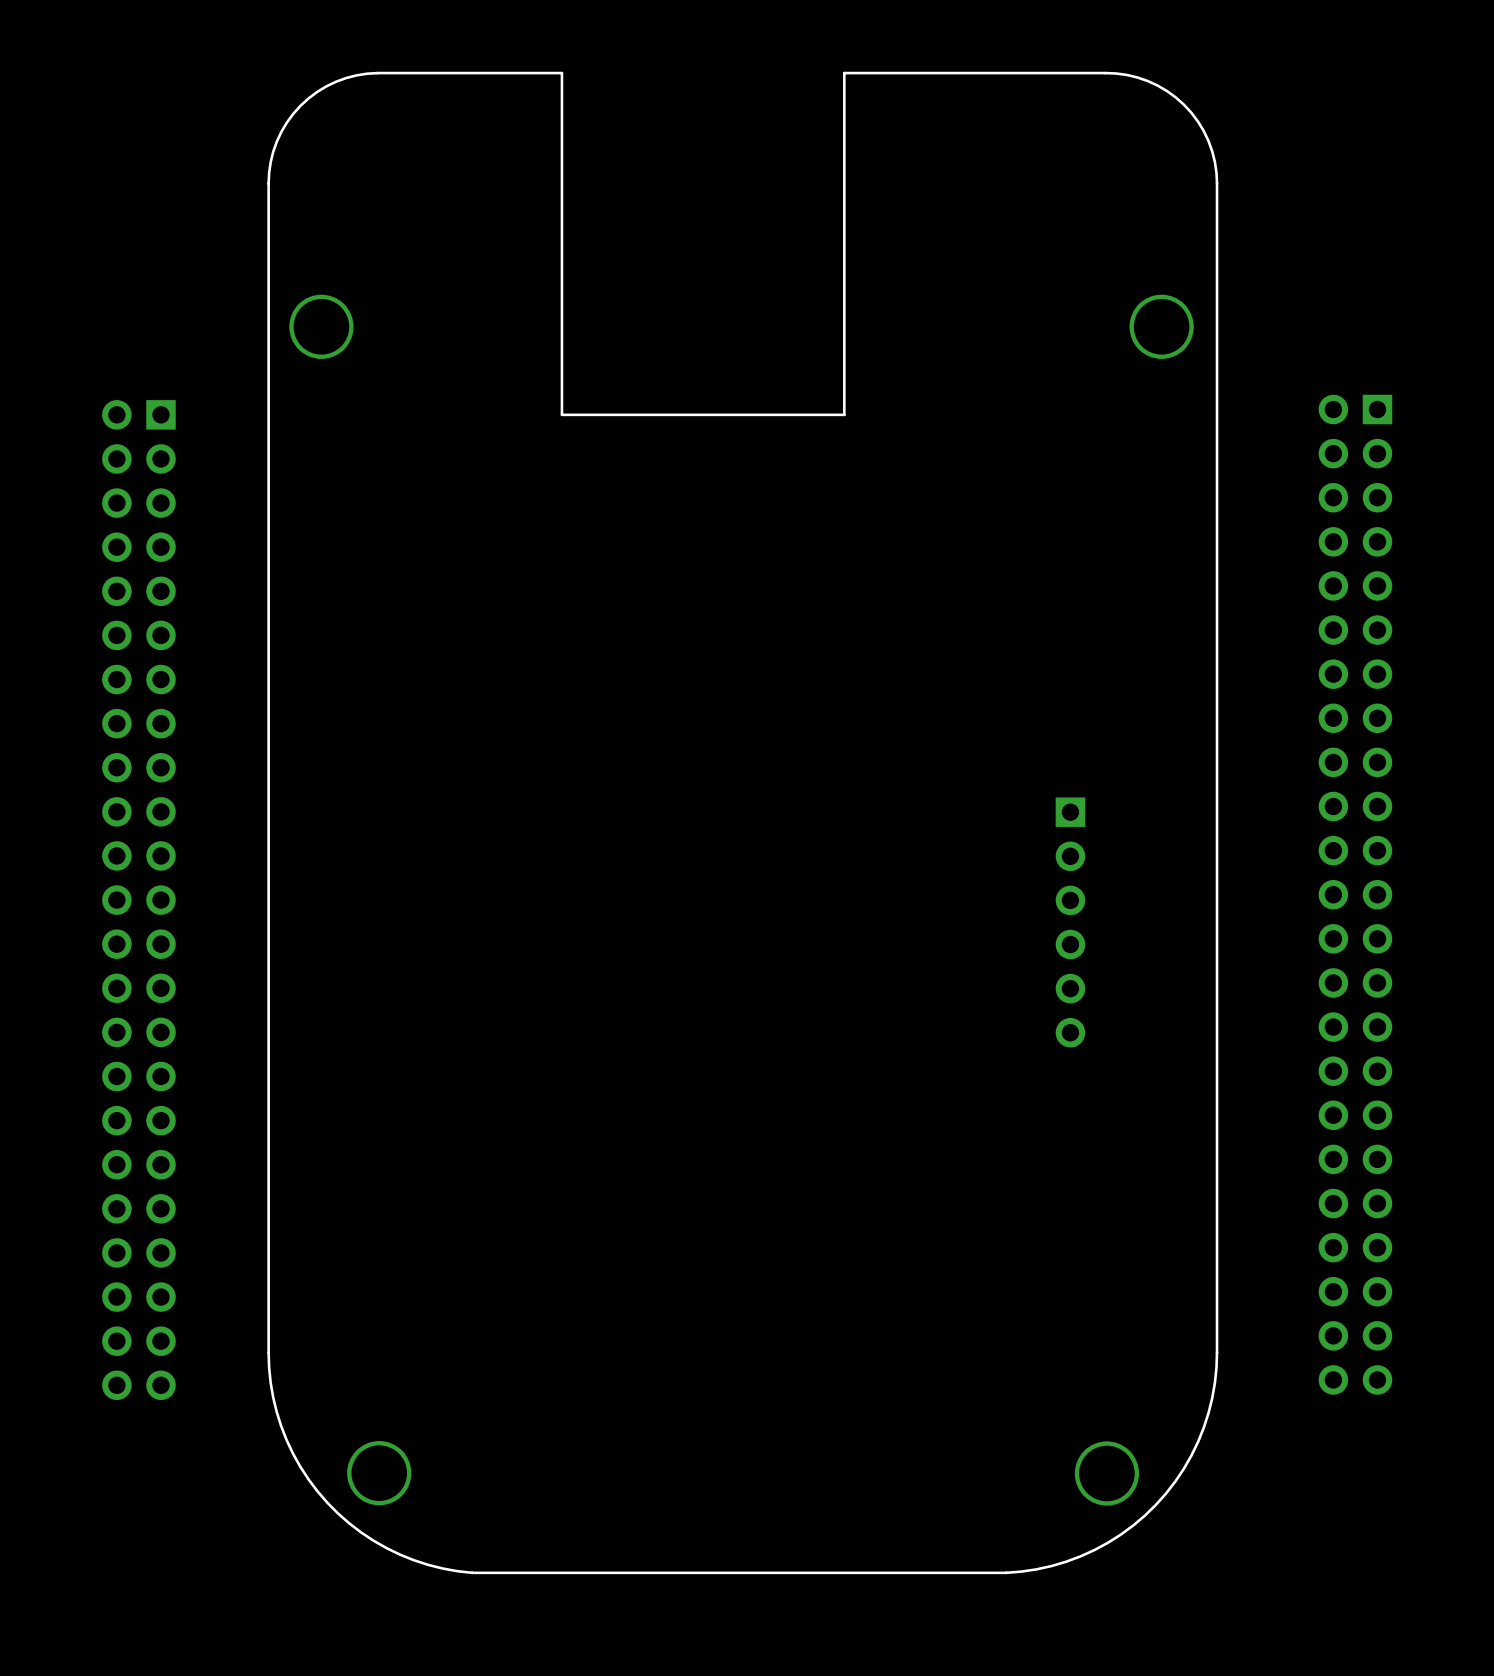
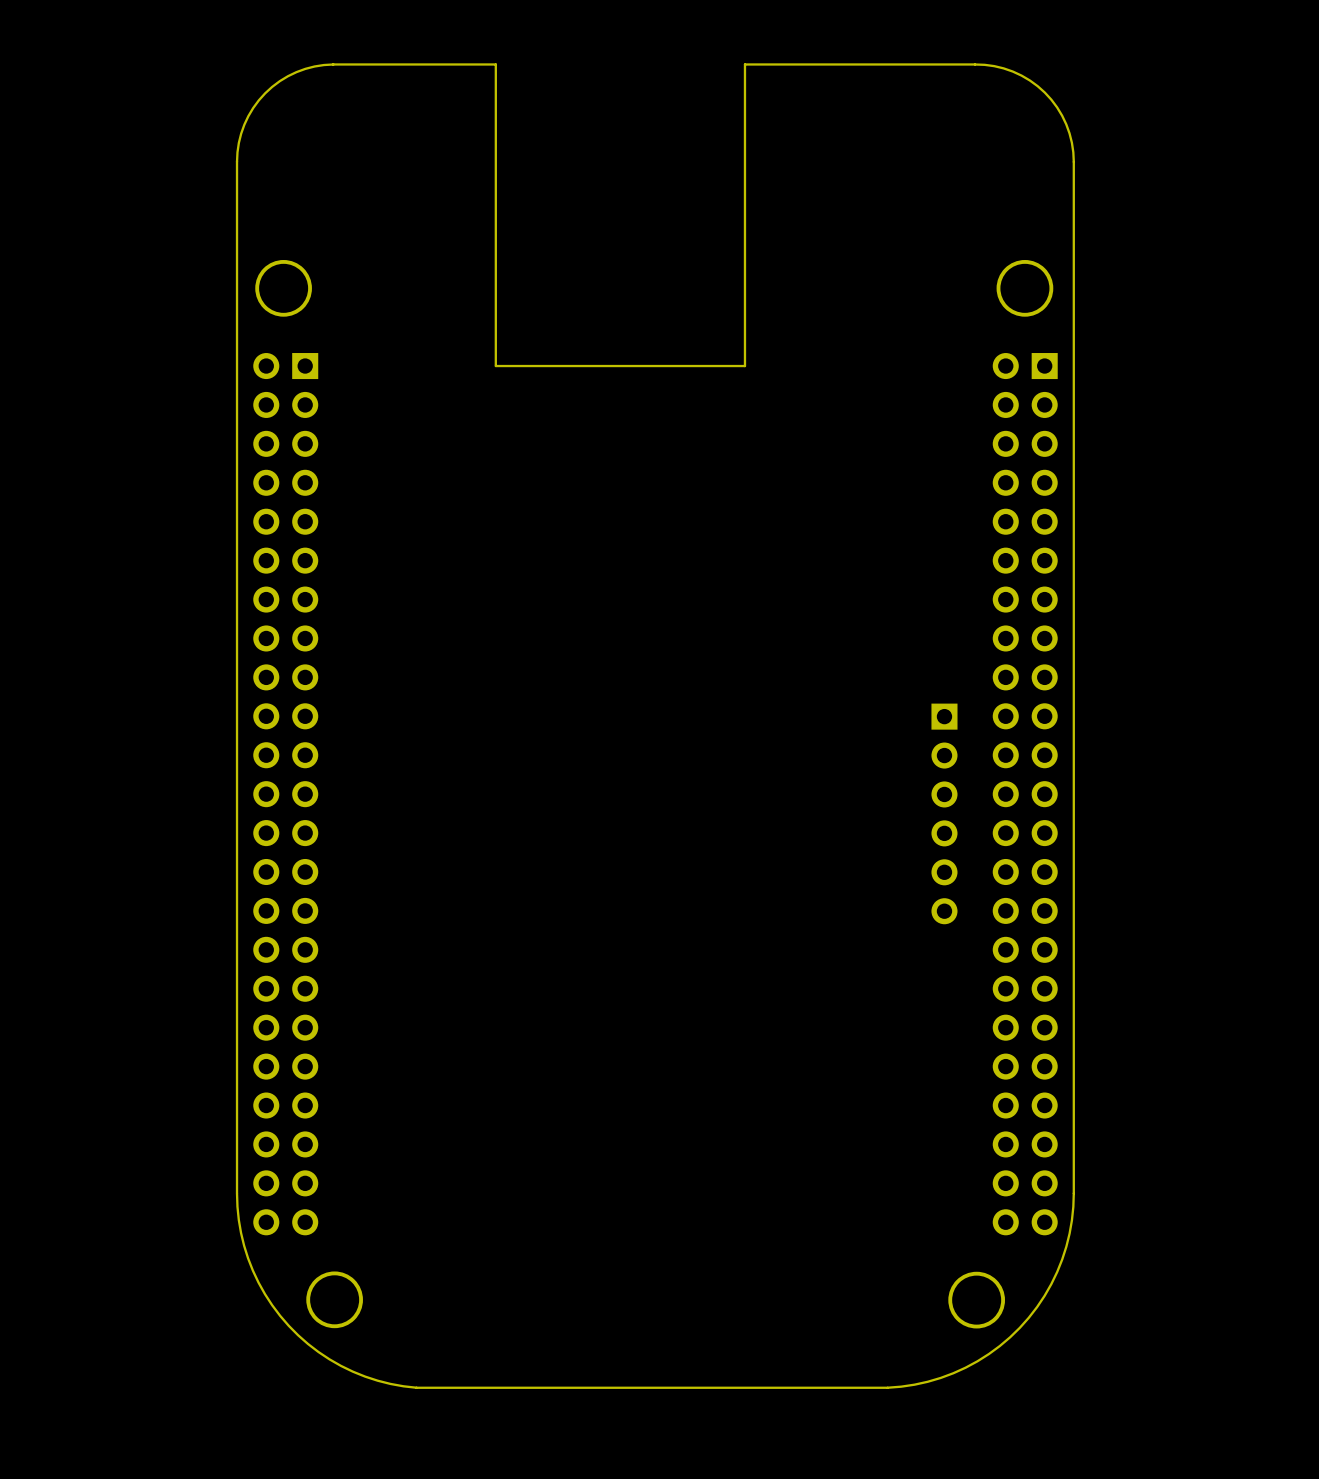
part position: (1355, 894) -> (1025, 794)
part position: (138, 900) -> (285, 794)

